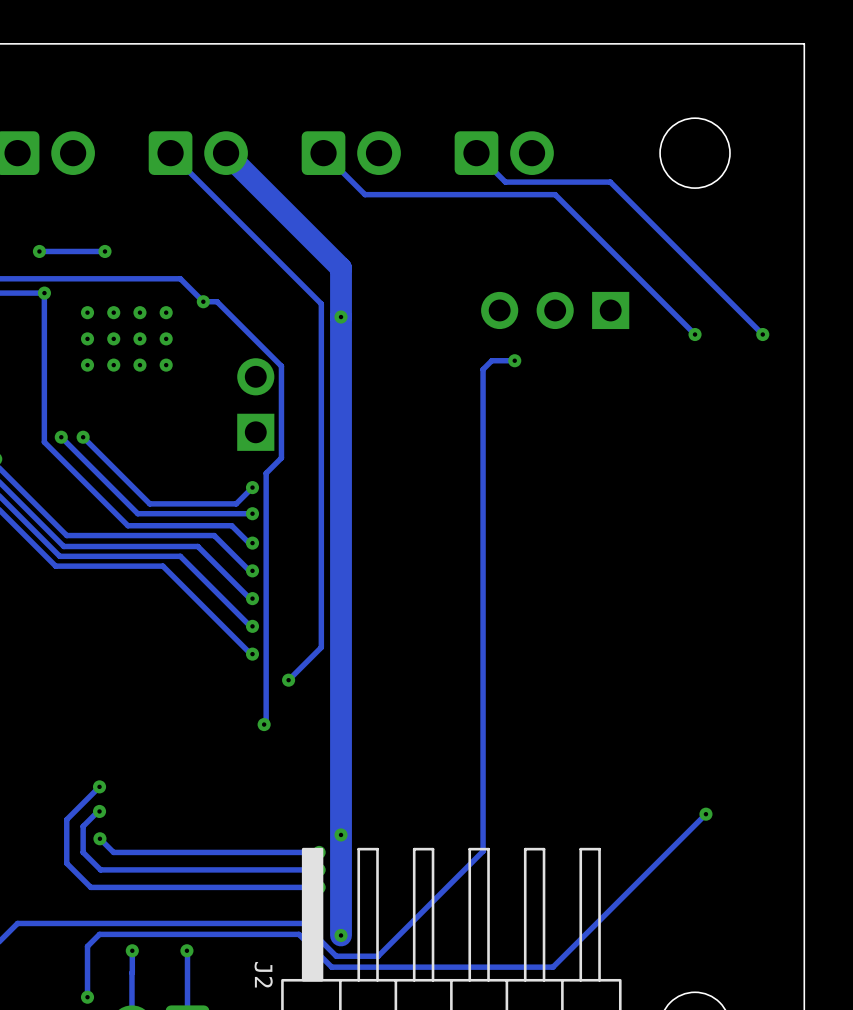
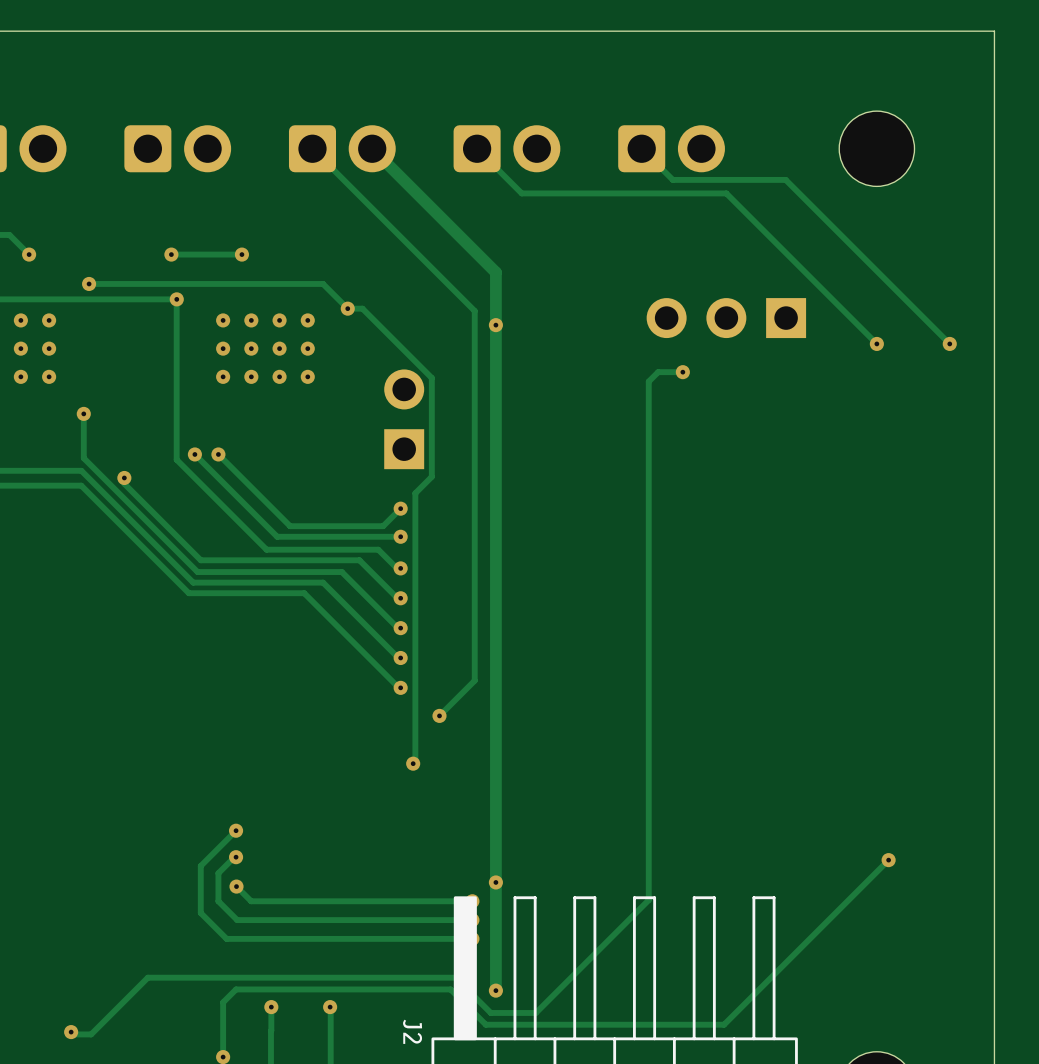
track width: thick (226, 153) (341, 268) (341, 935) -> thin (372, 148) (495, 272) (495, 990)

